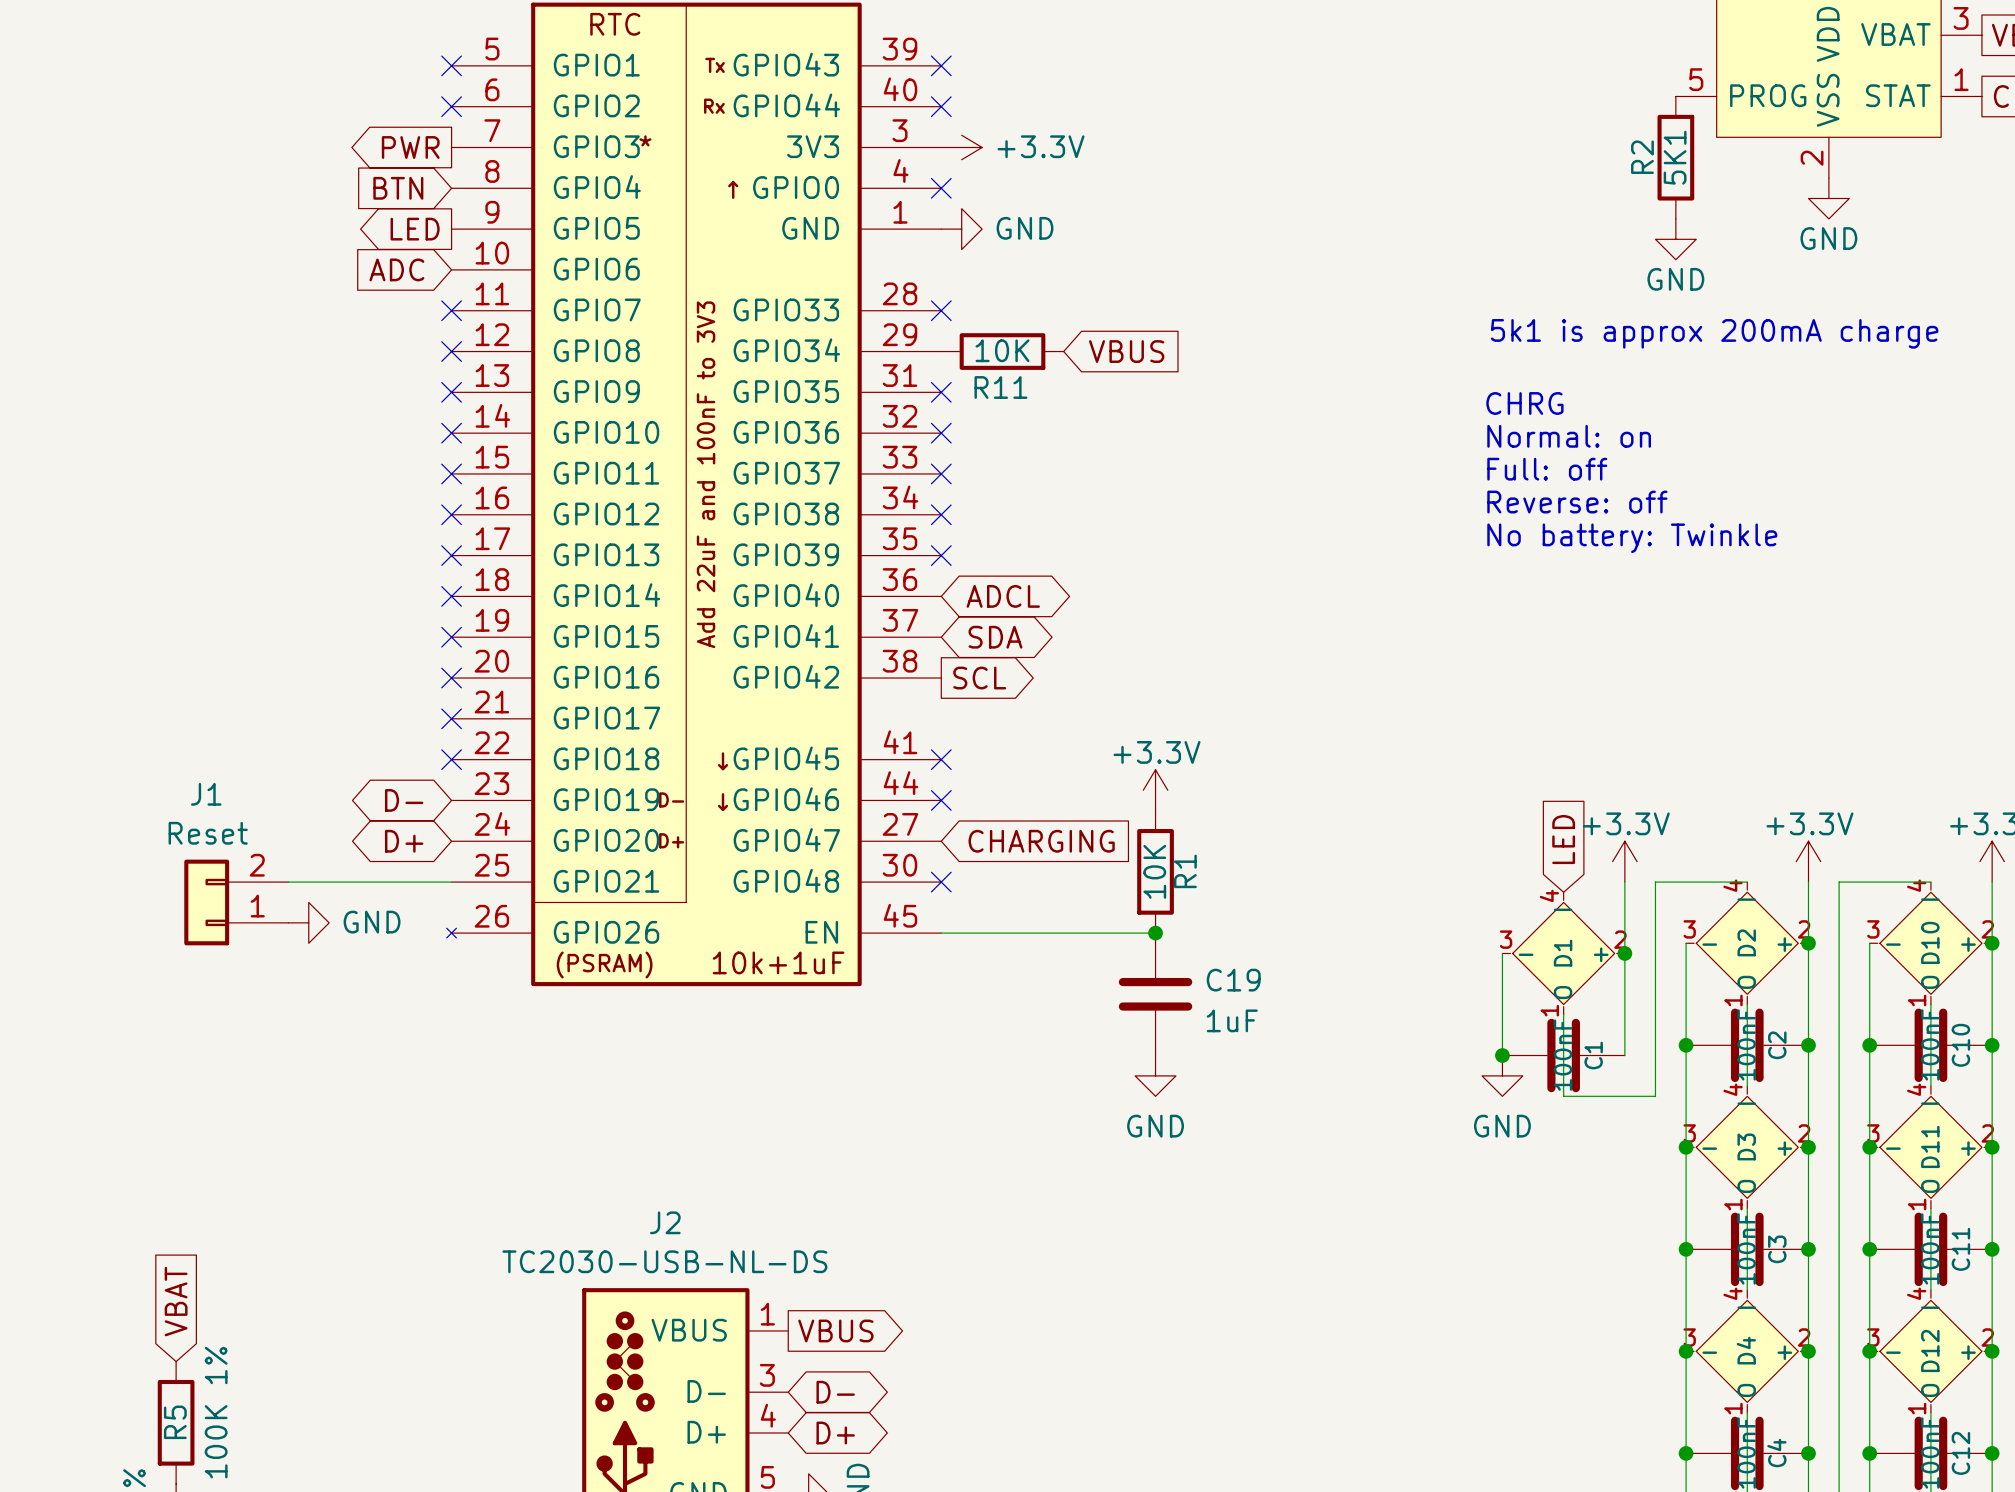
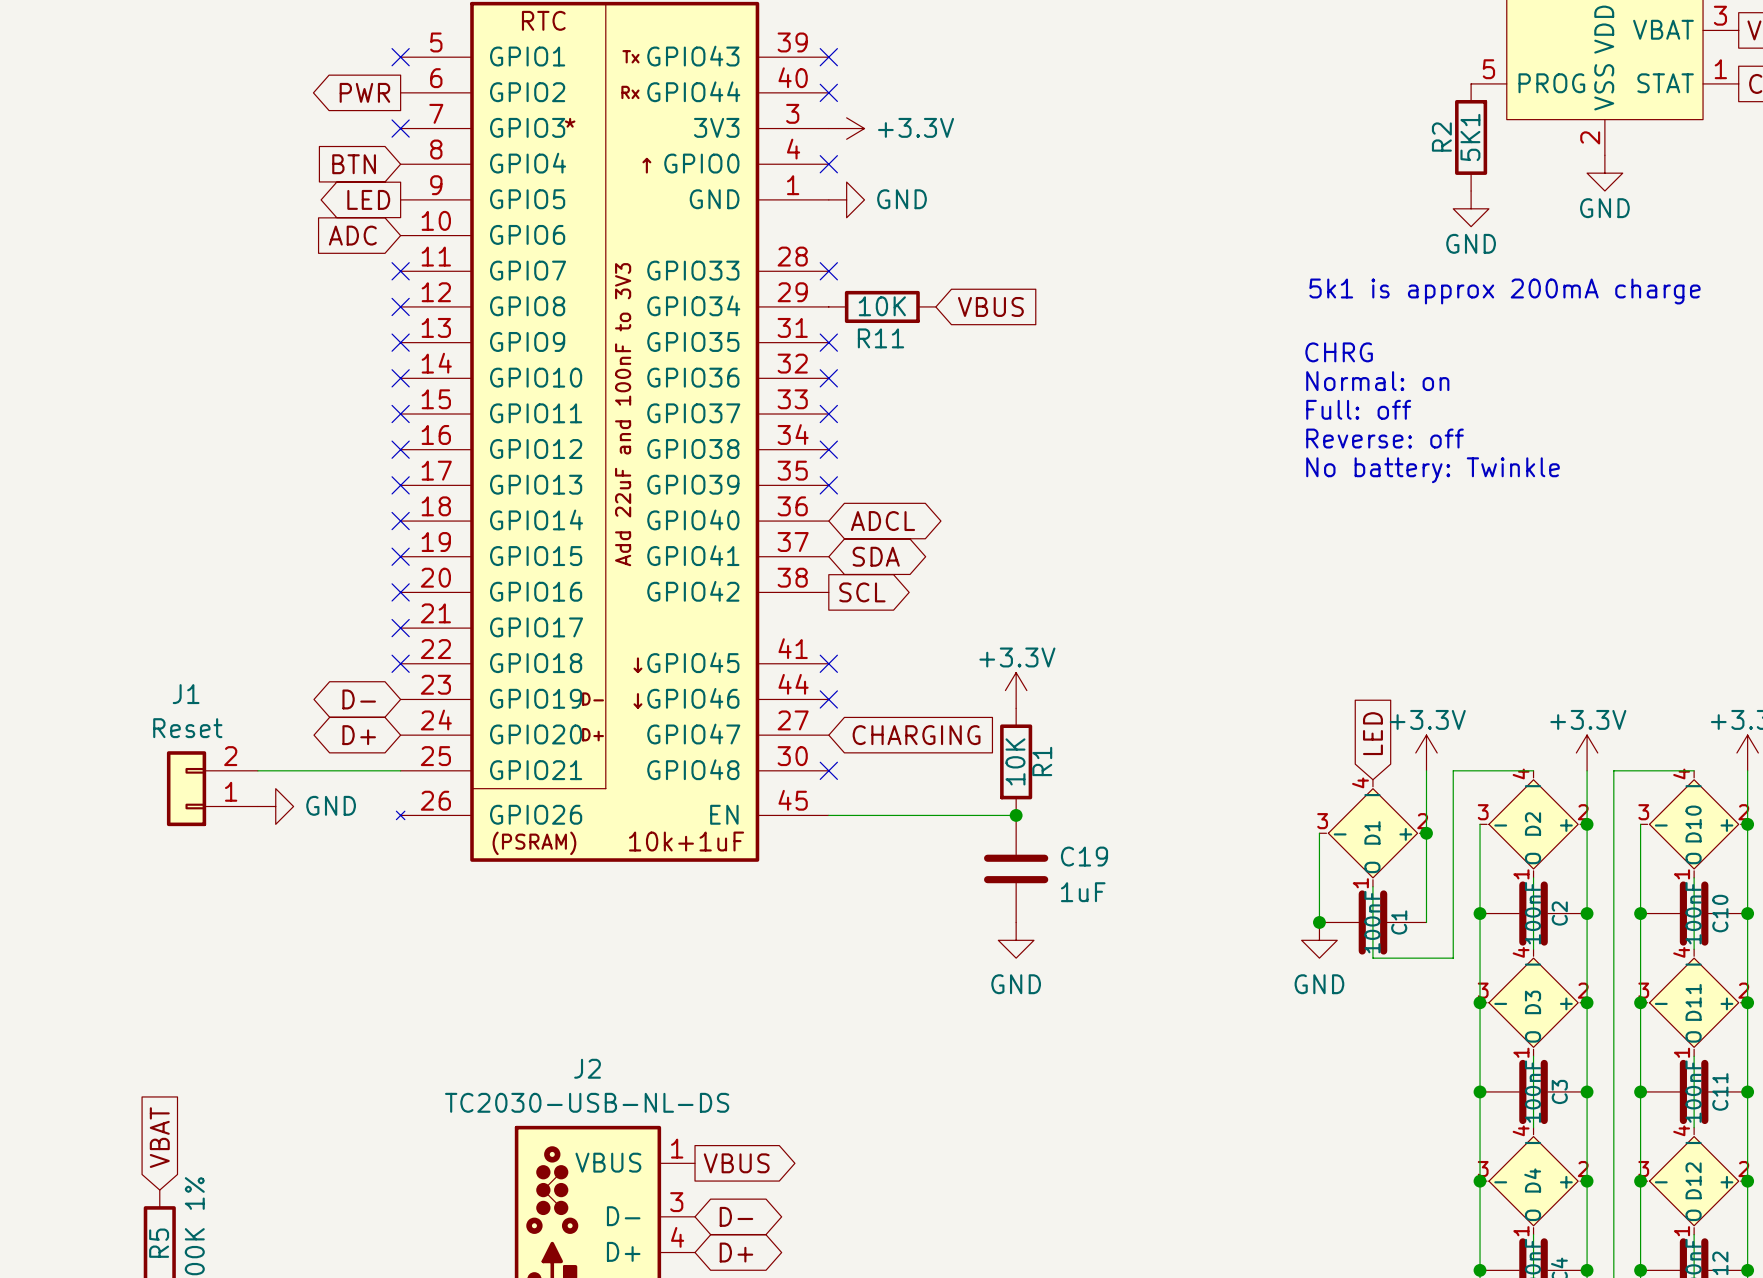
no-connect mark position: (451, 106) -> (400, 128)
global label position: PWR (410, 147) -> PWR (364, 92)

